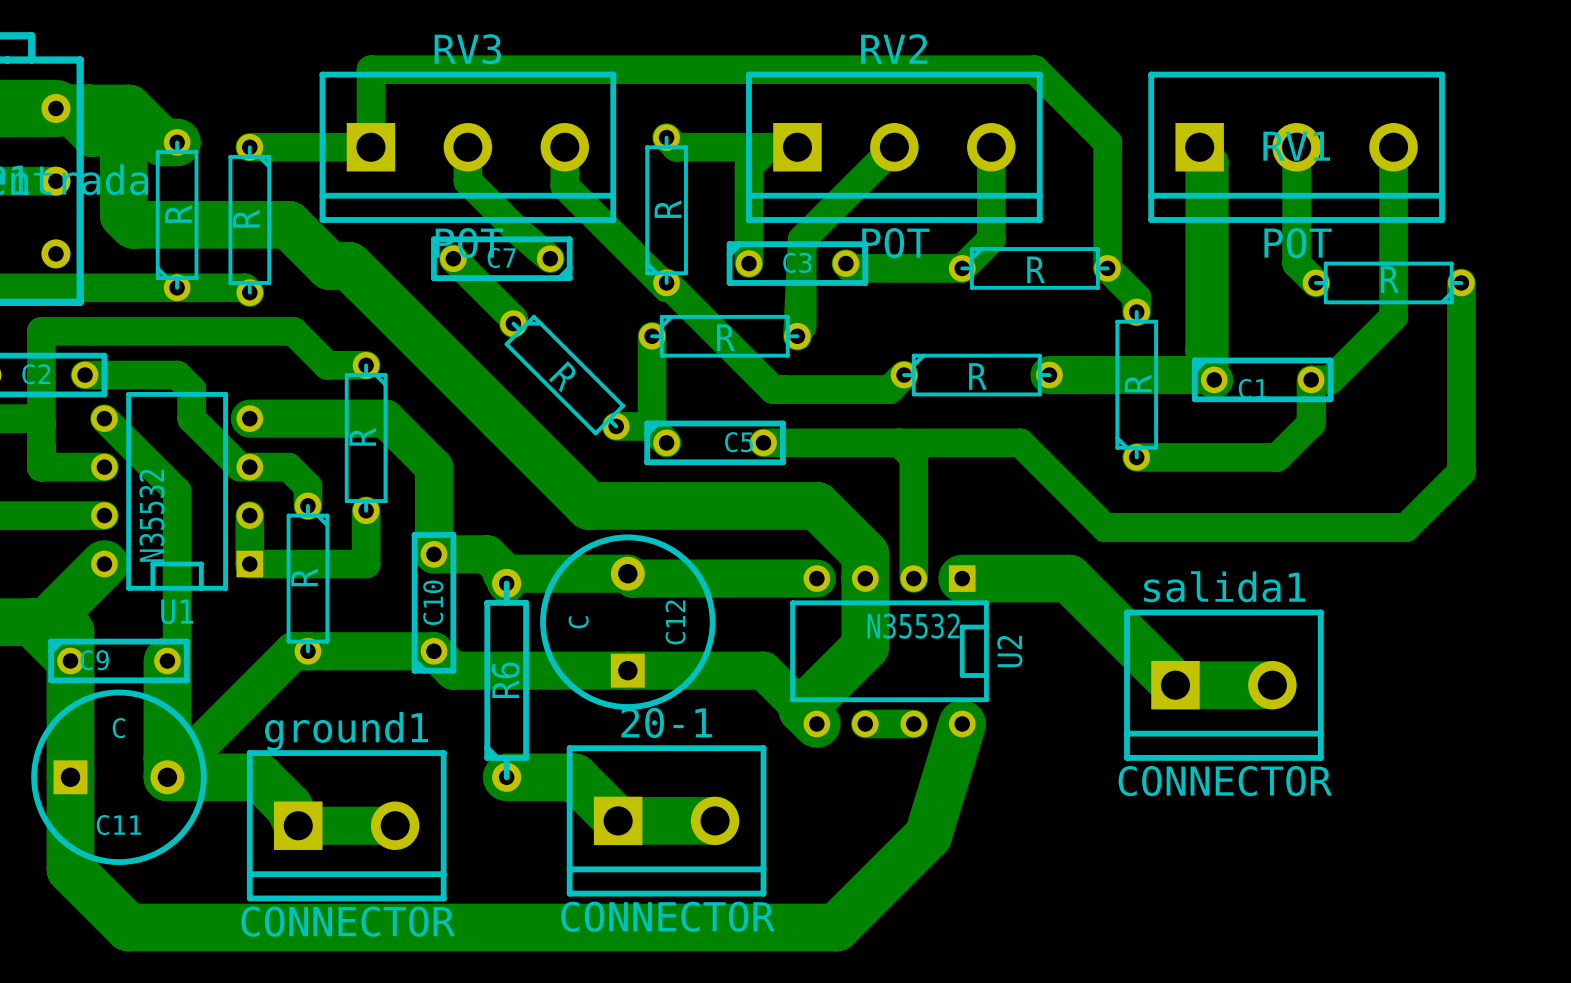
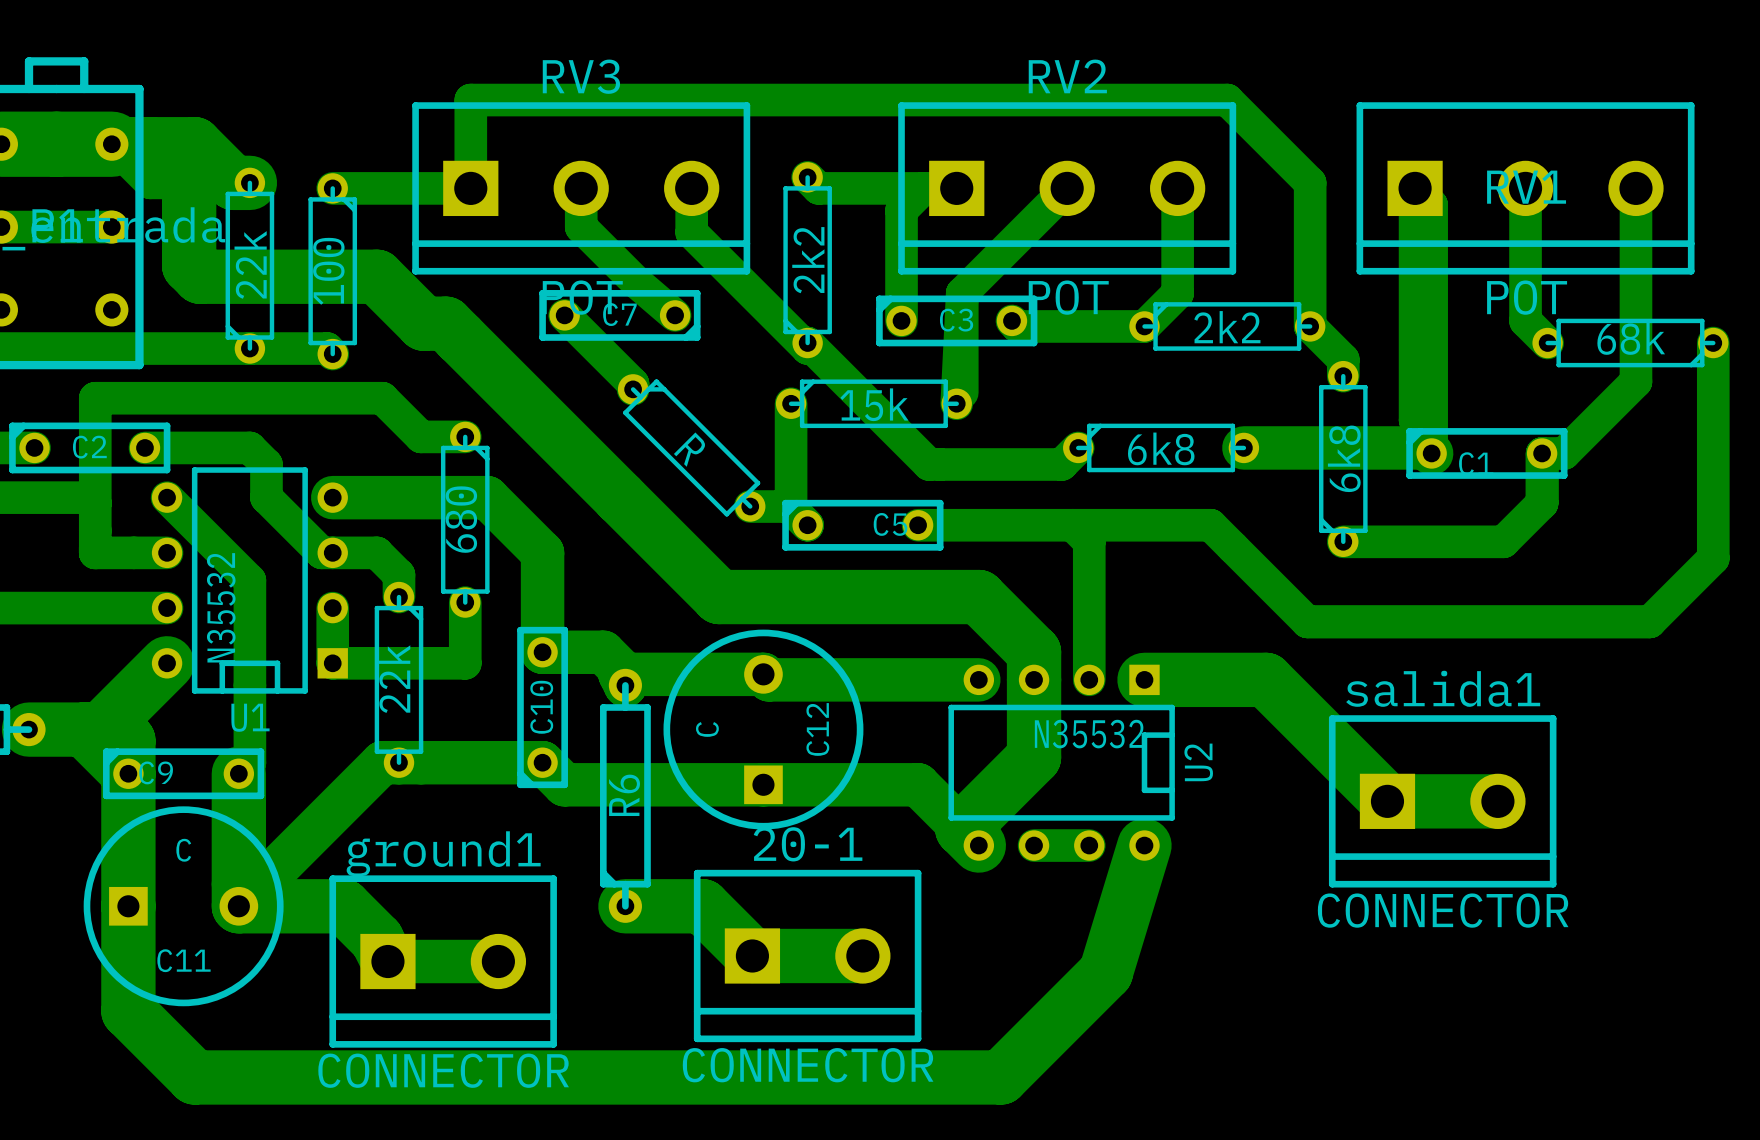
part value: R (668, 209) -> 2k2 (808, 260)
part value: R (178, 213) -> 22k (250, 264)
part value: R (246, 218) -> 100 (328, 271)
part value: R (1036, 269) -> 2k2 (1227, 327)
part value: R (1389, 279) -> 68k (1631, 338)
part value: R (725, 337) -> 15k (874, 404)
part value: R (977, 376) -> 6k8 (1161, 448)
part value: R (1138, 383) -> 6k8 (1344, 458)
part value: R (362, 436) -> 680 (461, 519)
part value: R (304, 577) -> 22k (394, 679)

